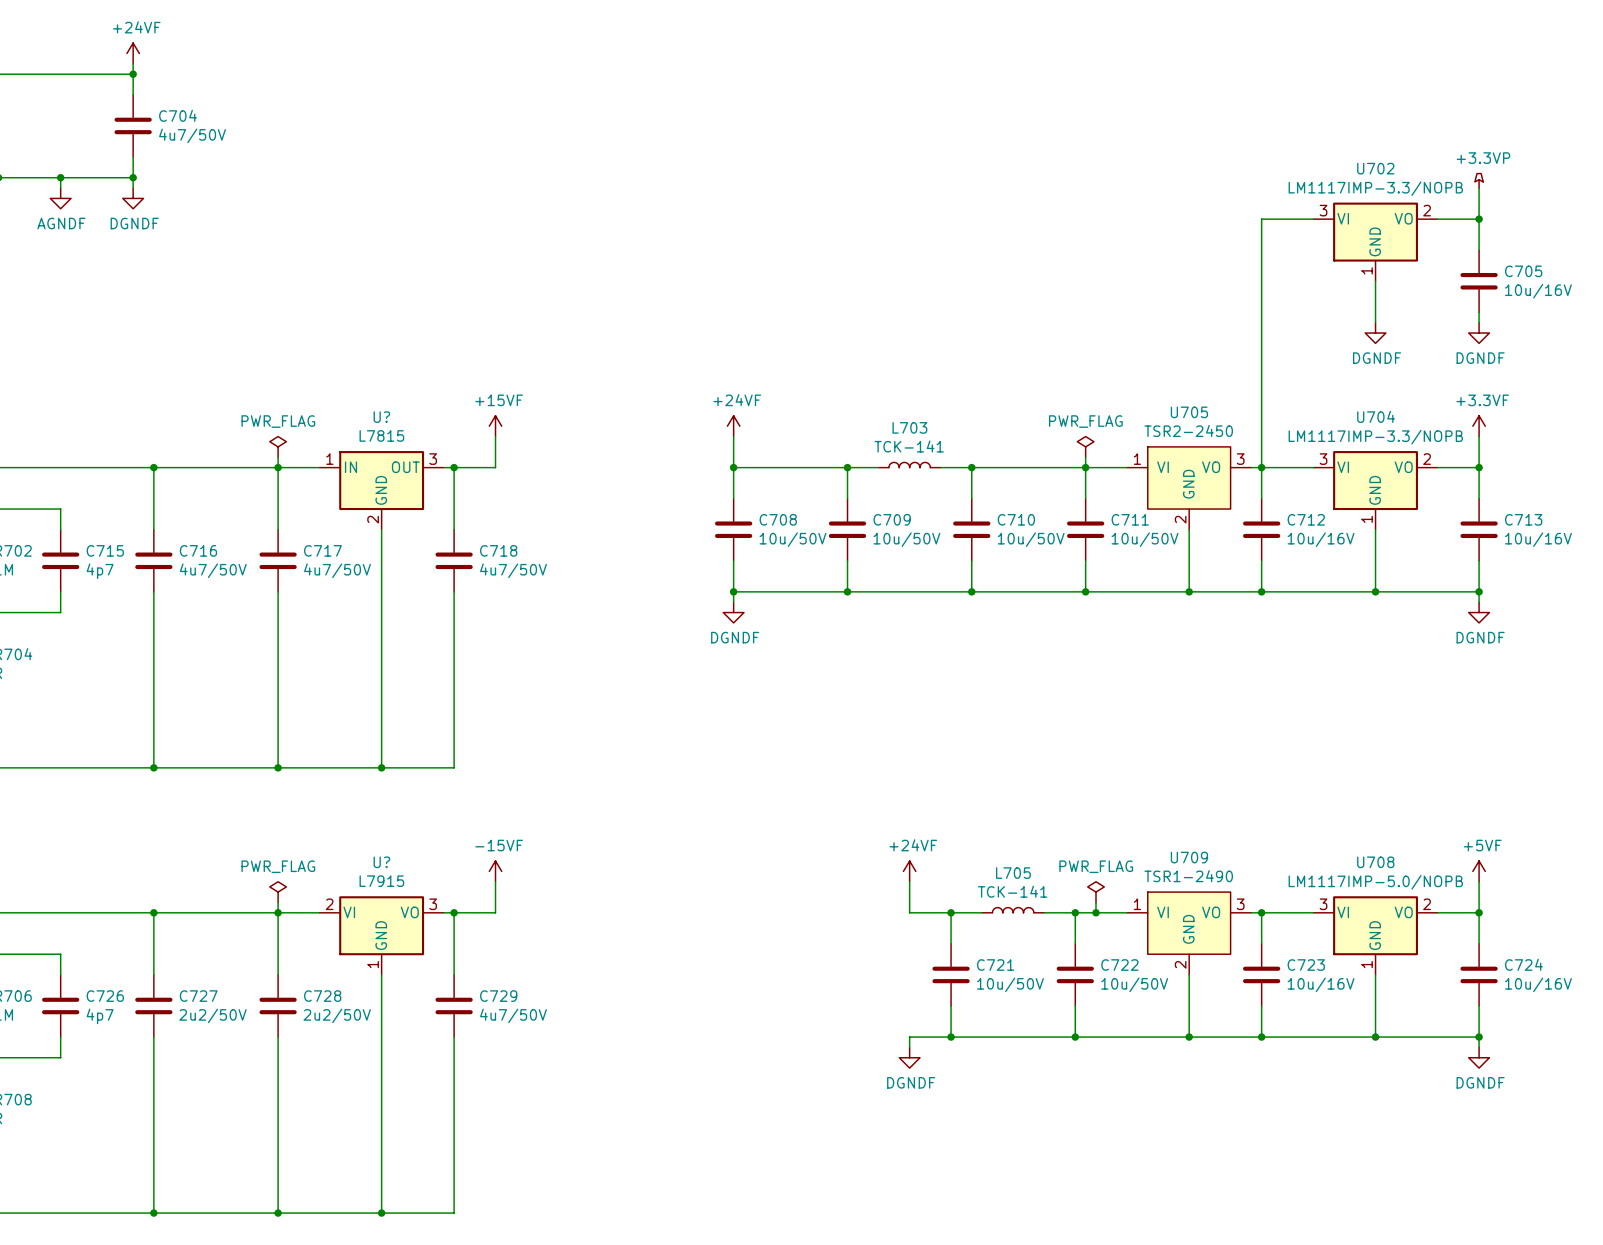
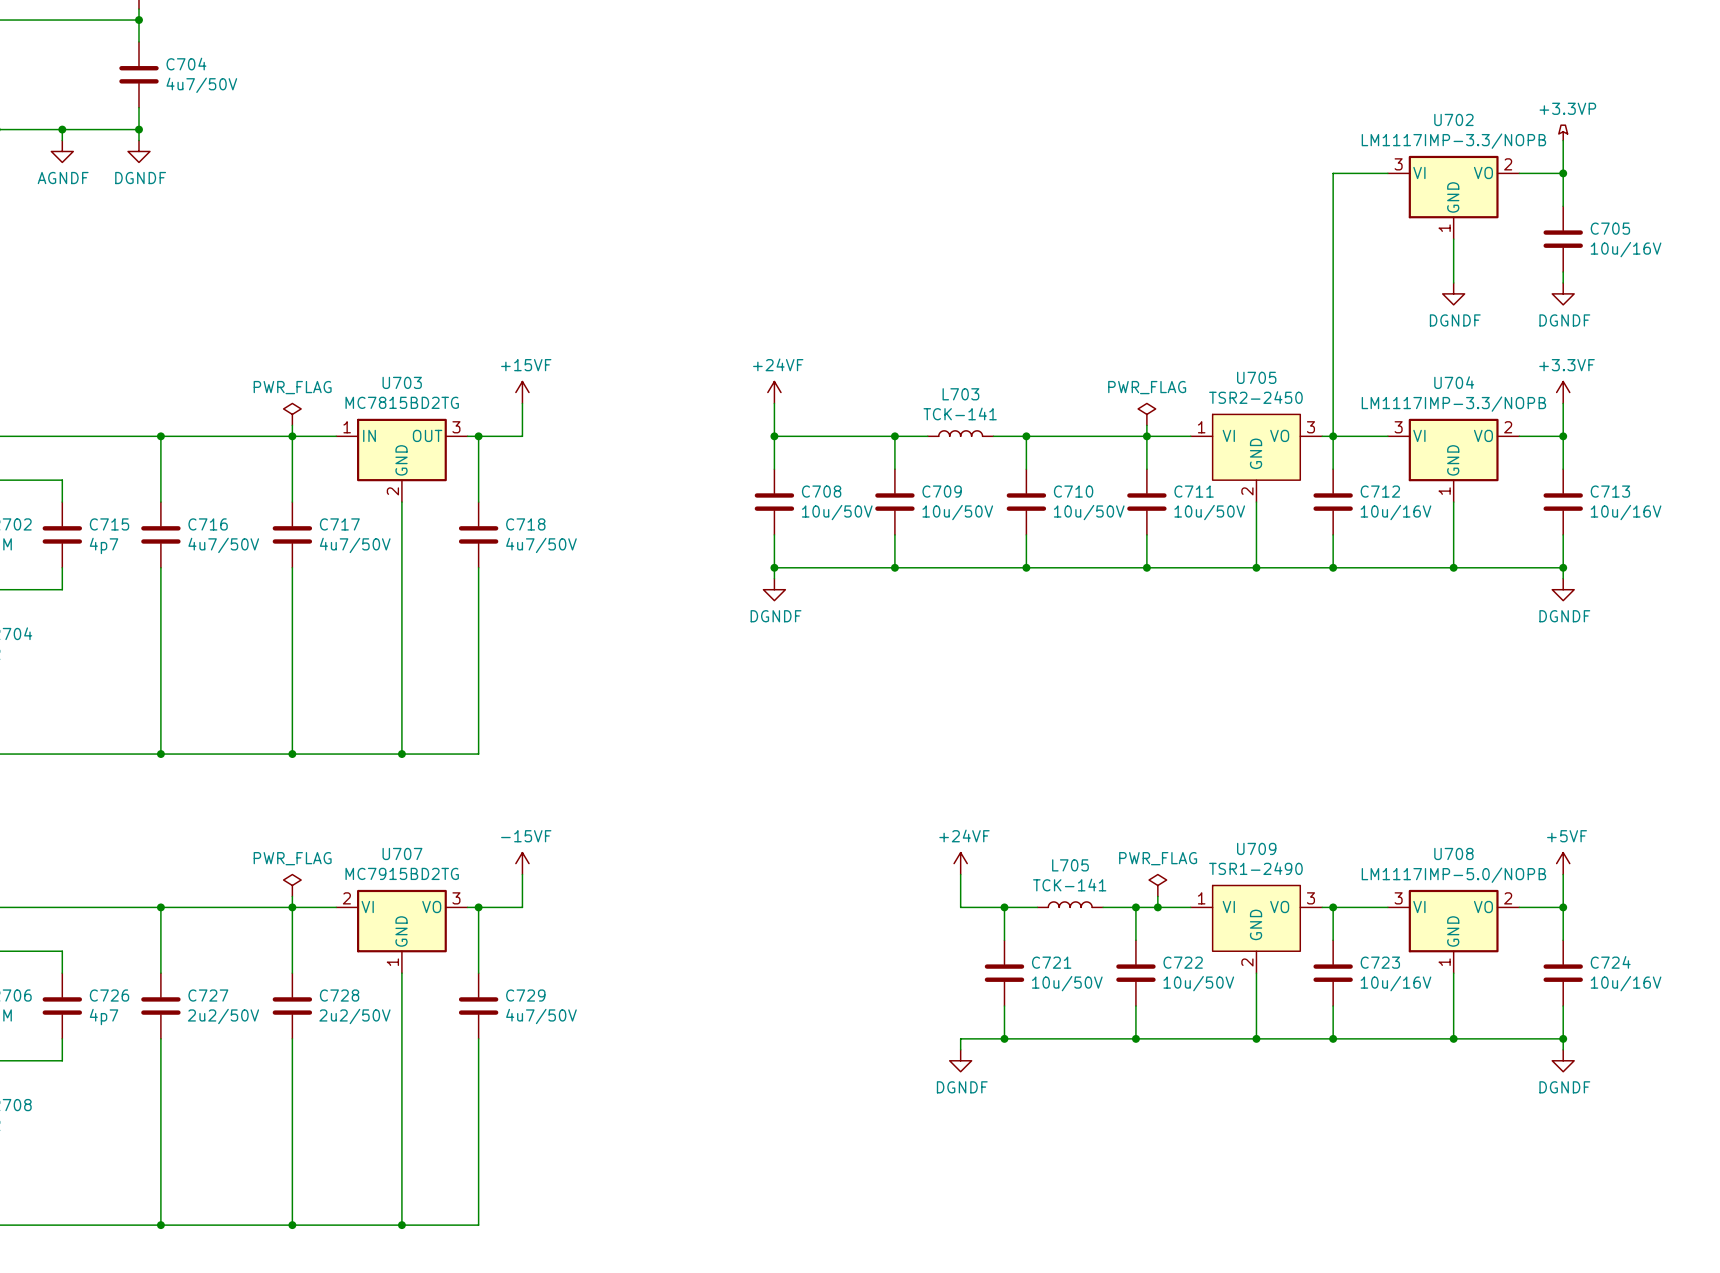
U? name: U? (381, 417) -> U703 (402, 382)
U? value: L7815 (381, 435) -> MC7815BD2TG (402, 402)
U? name: U? (381, 862) -> U707 (402, 853)
U? value: L7915 (381, 881) -> MC7915BD2TG (402, 873)

